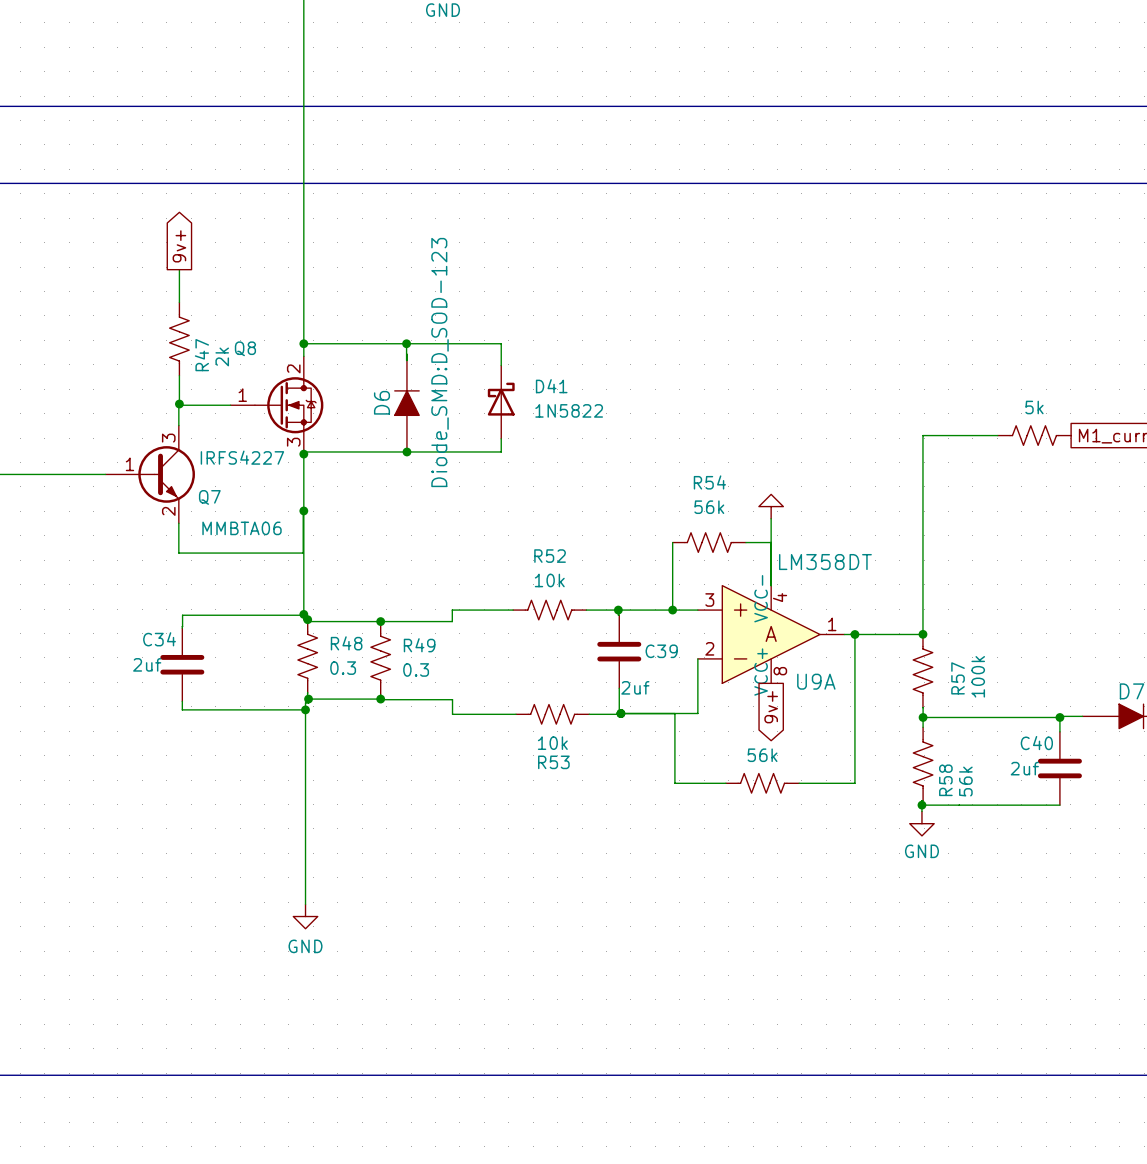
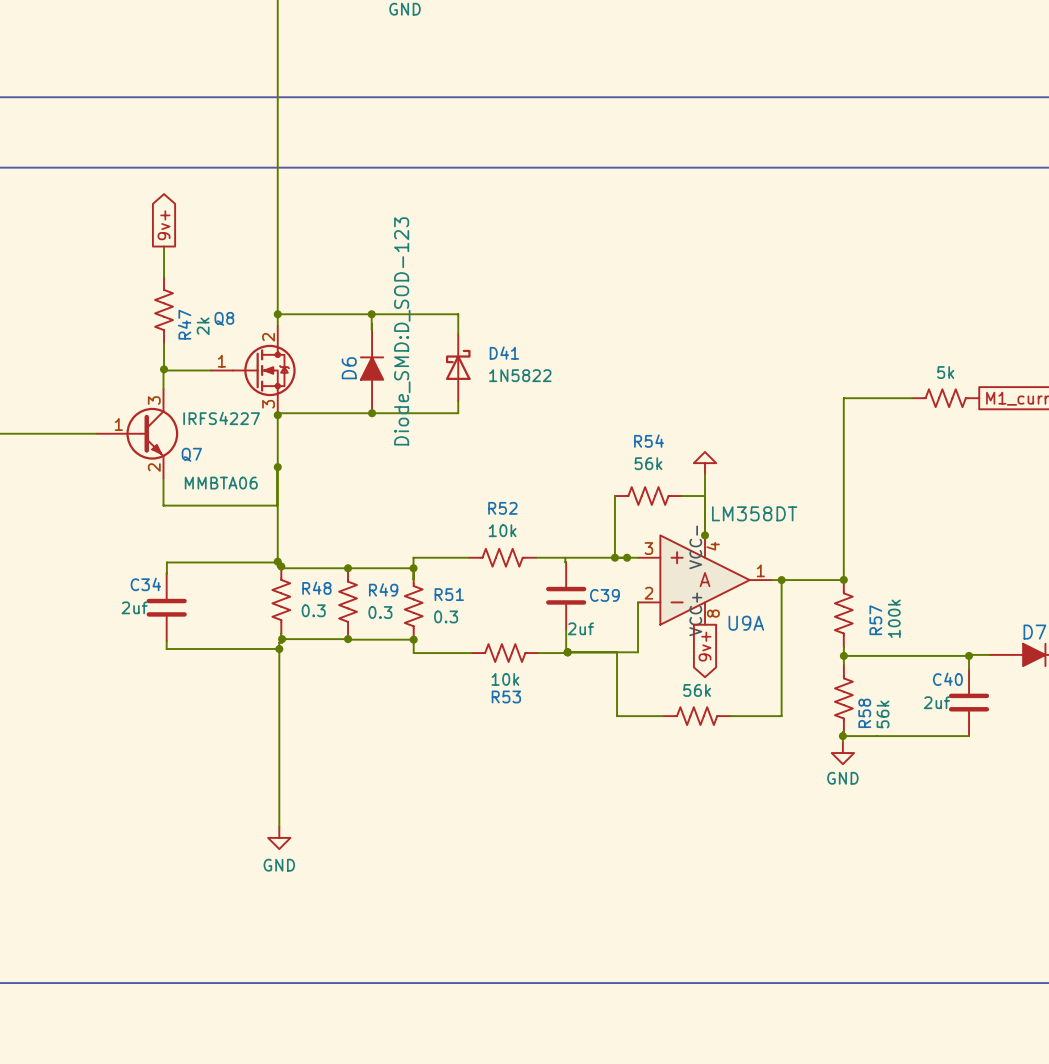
junction: none -> (705, 535)
junction: (618, 610) -> none
junction: none -> (627, 557)
wire: none -> (413, 568) (413, 579) (413, 572)
junction: none -> (413, 568)
R51: none -> 0.3 (413, 606)
junction: none -> (413, 639)

